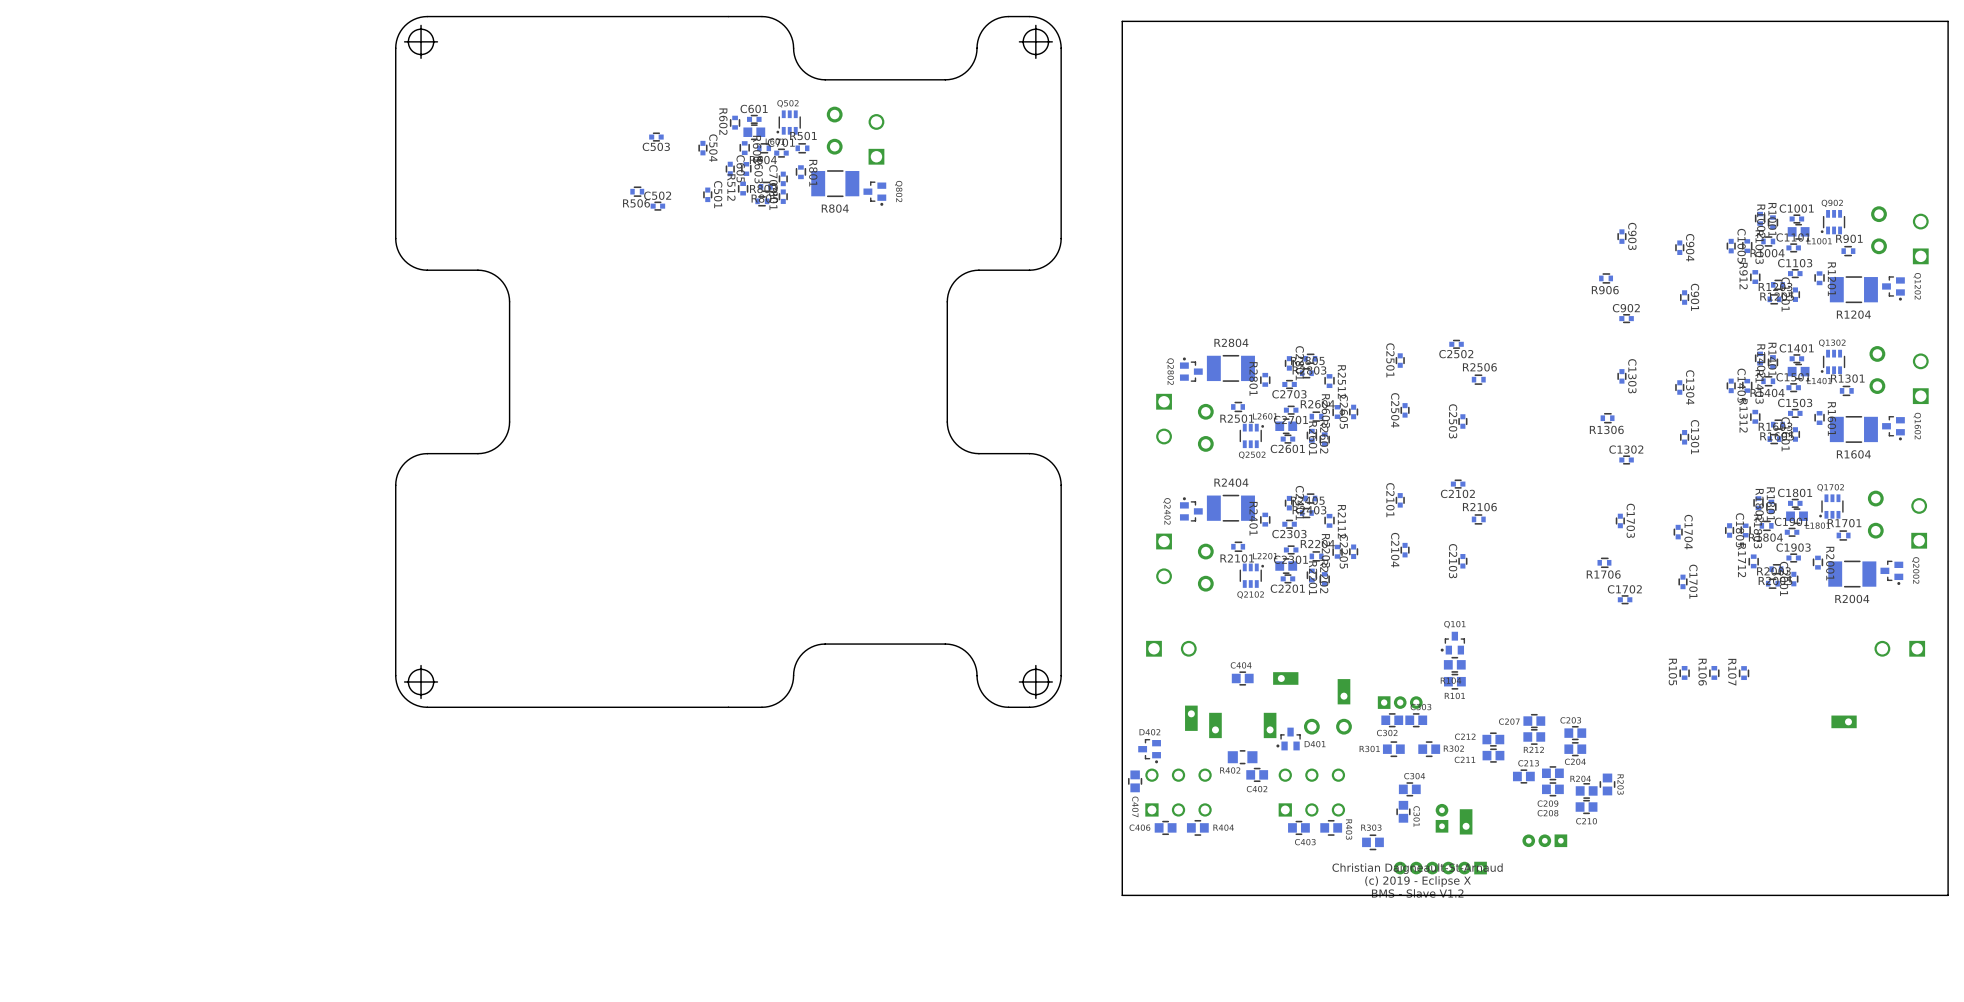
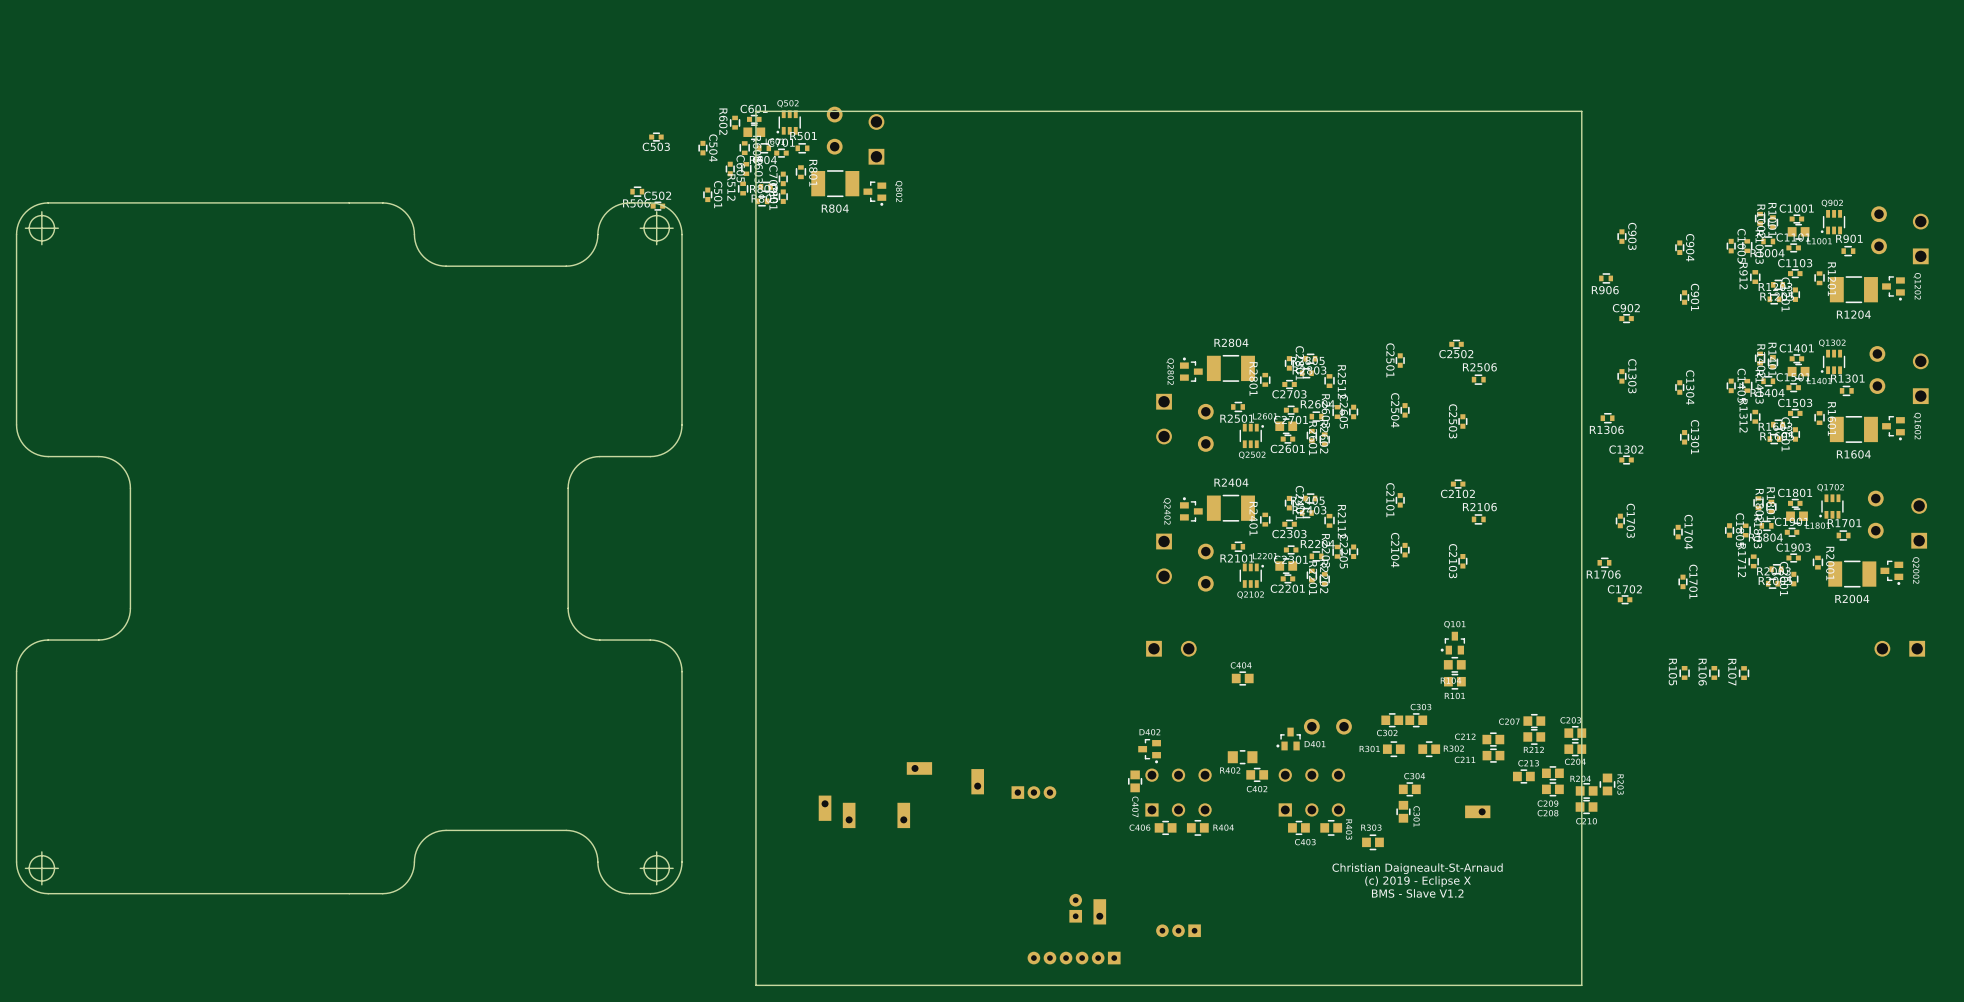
board edge: (1029, 16) (1001, 17) (988, 23) (980, 34) (975, 58) (970, 67) (959, 76) (945, 79) (825, 79) (814, 78) (805, 72) (798, 65) (794, 55) (791, 37) (786, 28) (775, 19) (765, 16) (427, 16) (413, 19) (404, 25) (398, 34) (395, 48) (395, 238) (397, 249) (404, 260) (420, 269) (477, 270) (491, 273) (504, 285) (509, 301) (509, 422) (504, 438) (497, 446) (484, 452) (416, 455) (404, 462) (396, 478) (395, 675) (397, 686) (404, 698) (416, 705) (427, 707) (765, 707) (778, 702) (788, 692) (792, 682) (795, 665) (802, 653) (811, 647) (825, 644) (952, 644) (962, 648) (970, 655) (975, 665) (980, 689) (986, 698) (994, 704) (1005, 707) (1033, 707) (1043, 704) (1051, 698) (1059, 686) (1061, 675) (1061, 485) (1059, 474) (1051, 462) (1036, 454) (978, 453) (965, 450) (952, 438) (947, 422) (947, 301) (952, 285) (962, 275) (971, 271) (1039, 268) (1054, 258) (1060, 245) (1060, 44) (1058, 34) (1051, 25) (1043, 19) (1029, 16) -> none
board edge: (1948, 21) (1122, 21) (1122, 895) (1948, 895) (1948, 21) -> none
board edge: (421, 25) (421, 58) -> none
board edge: (1035, 25) (1035, 58) -> none
round board edge: [407, 28, 435, 56] -> none
round board edge: [1022, 28, 1050, 56] -> none
board edge: (437, 41) (404, 41) -> none
board edge: (1052, 41) (1019, 41) -> none
board edge: none -> (1581, 111) (755, 111) (755, 985) (1581, 985) (1581, 111)
board edge: none -> (650, 202) (622, 203) (609, 209) (600, 220) (596, 245) (590, 254) (579, 263) (566, 266) (446, 266) (435, 264) (426, 259) (419, 251) (415, 241) (412, 224) (407, 214) (396, 206) (386, 203) (48, 202) (34, 206) (25, 212) (19, 220) (16, 234) (16, 424) (18, 435) (25, 447) (41, 455) (98, 456) (112, 459) (125, 471) (130, 488) (130, 608) (125, 625) (118, 633) (105, 639) (37, 641) (25, 649) (17, 664) (16, 862) (18, 872) (25, 884) (37, 891) (48, 893) (386, 893) (399, 888) (409, 878) (413, 869) (416, 851) (423, 839) (435, 832) (446, 830) (573, 831) (583, 835) (590, 842) (596, 851) (600, 875) (607, 884) (615, 890) (625, 893) (653, 893) (664, 890) (672, 884) (680, 872) (681, 862) (681, 671) (680, 661) (672, 649) (657, 640) (599, 640) (586, 636) (572, 625) (568, 608) (568, 488) (572, 471) (580, 463) (592, 457) (660, 454) (672, 447) (681, 431) (681, 231) (678, 220) (672, 212) (660, 204) (650, 202)
board edge: none -> (41, 211) (41, 244)
board edge: none -> (656, 211) (656, 244)
round board edge: none -> [28, 214, 56, 242]
round board edge: none -> [643, 214, 670, 242]
board edge: none -> (58, 228) (25, 228)
board edge: none -> (673, 228) (640, 228)
board edge: (421, 665) (421, 698) -> none
board edge: (1035, 665) (1035, 698) -> none
round board edge: [407, 668, 435, 696] -> none
round board edge: [1022, 668, 1050, 696] -> none
part: (1285, 678) -> none
board edge: (437, 681) (404, 681) -> none
board edge: (1052, 681) (1019, 681) -> none
part: (1343, 691) -> none
part: (1400, 702) -> none
part: (1191, 718) -> none
part: (1844, 721) -> none
part: (1215, 725) -> none
part: (1270, 725) -> none
part: none -> (919, 768)
part: none -> (977, 781)
part: none -> (1033, 792)
part: none -> (825, 808)
part: none -> (849, 815)
part: none -> (903, 815)
part: (1442, 818) -> none
part rotation: 0° (1466, 821) -> 90° counterclockwise (1477, 811)
part position: (1466, 821) -> (1477, 811)
part: (1544, 840) -> none
board edge: none -> (41, 851) (41, 884)
board edge: none -> (656, 851) (656, 884)
round board edge: none -> [28, 855, 56, 882]
round board edge: none -> [643, 855, 670, 882]
board edge: none -> (58, 868) (25, 868)
board edge: none -> (673, 868) (640, 868)
part: (1440, 868) -> none
part: none -> (1075, 908)
part: none -> (1099, 911)
part: none -> (1178, 930)
part: none -> (1074, 958)

